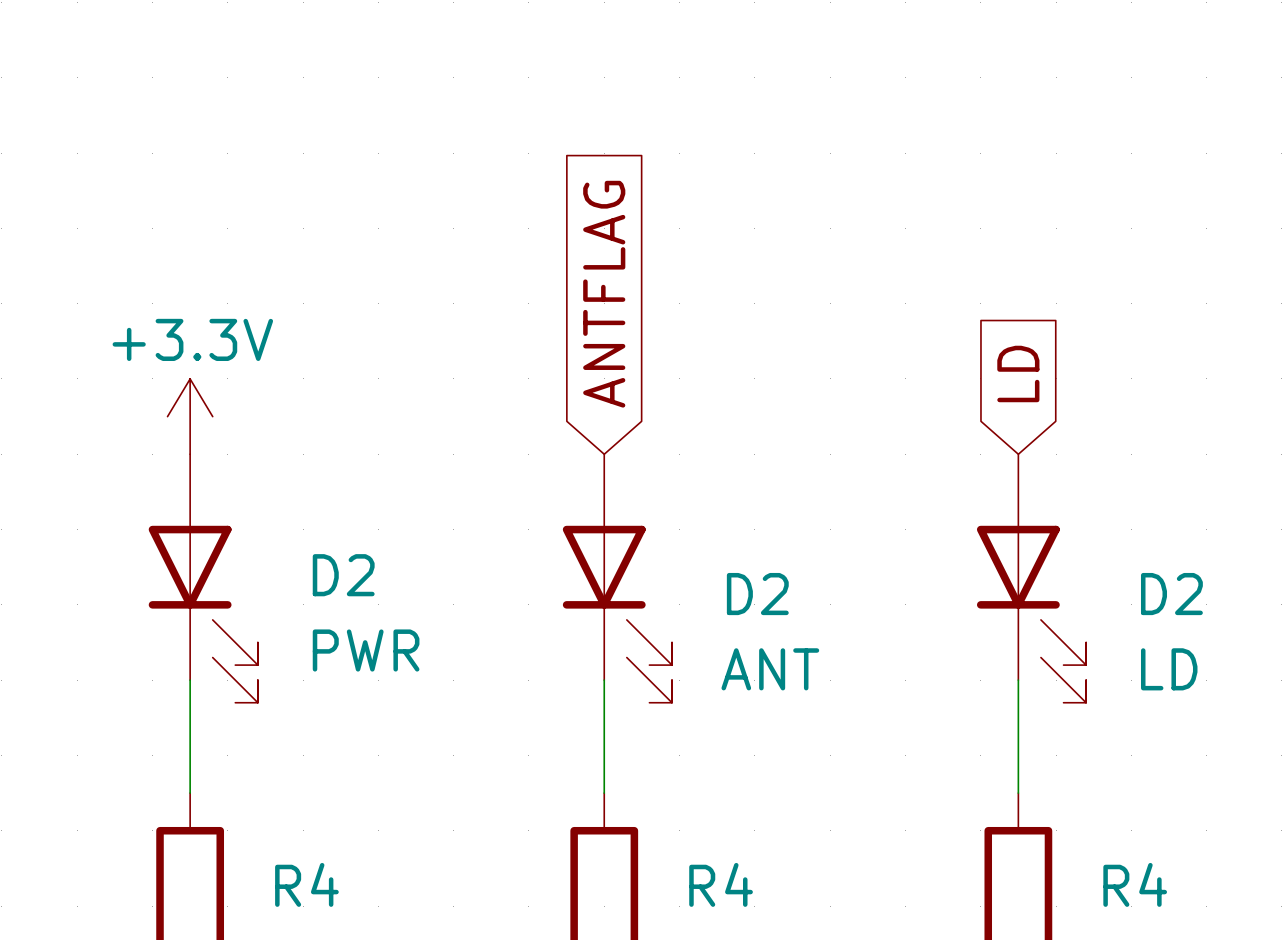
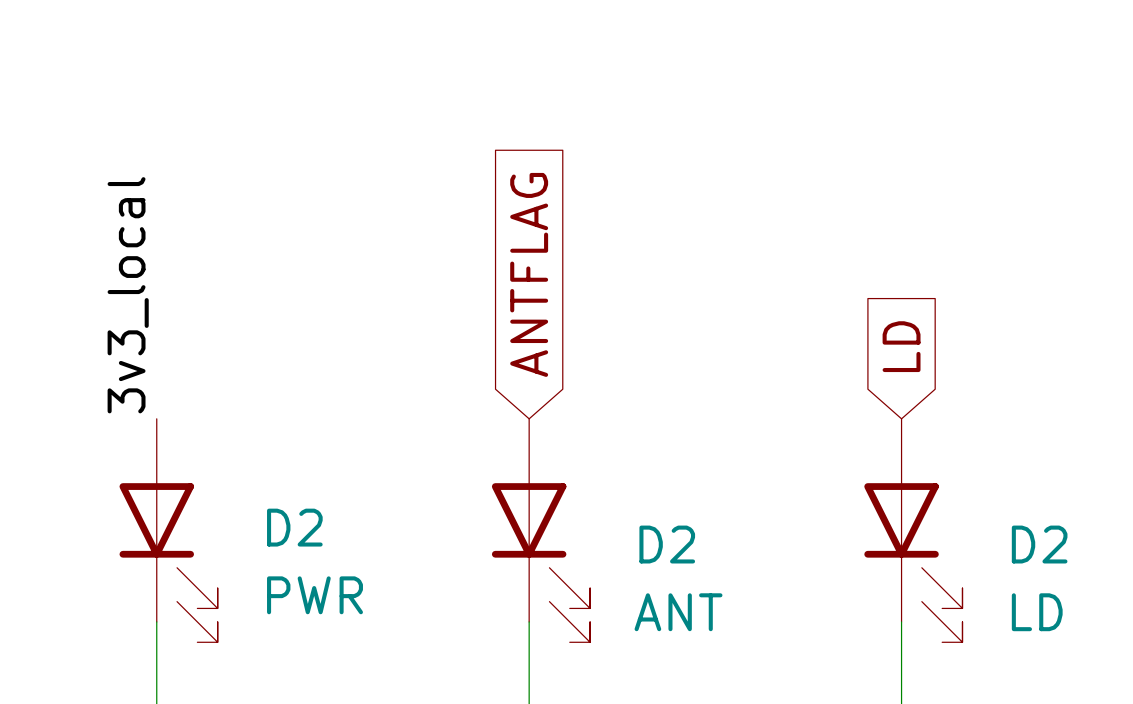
label: none -> 3v3_local (128, 295)
power symbol: +3.3V (190, 416) -> none

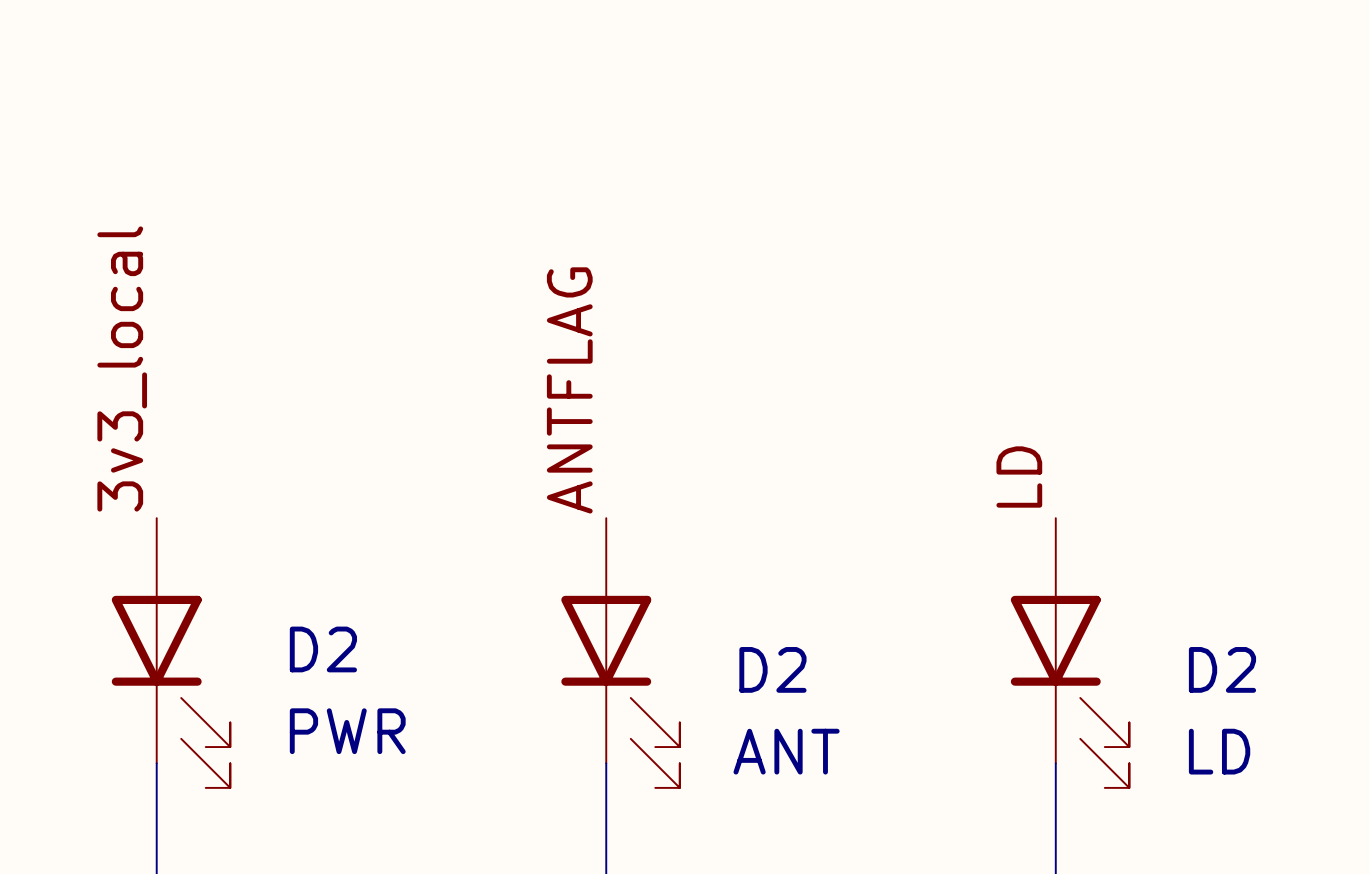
global label: ANTFLAG (529, 274) -> none
label: none -> ANTFLAG (569, 390)
global label: LD (901, 346) -> none
label: none -> LD (1019, 477)

